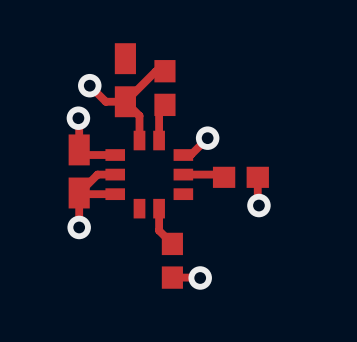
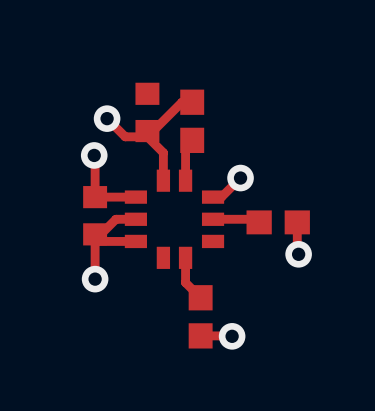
part footprint: [114, 43, 136, 118] -> [135, 82, 160, 143]
part footprint: [68, 134, 90, 209] -> [83, 186, 108, 246]

